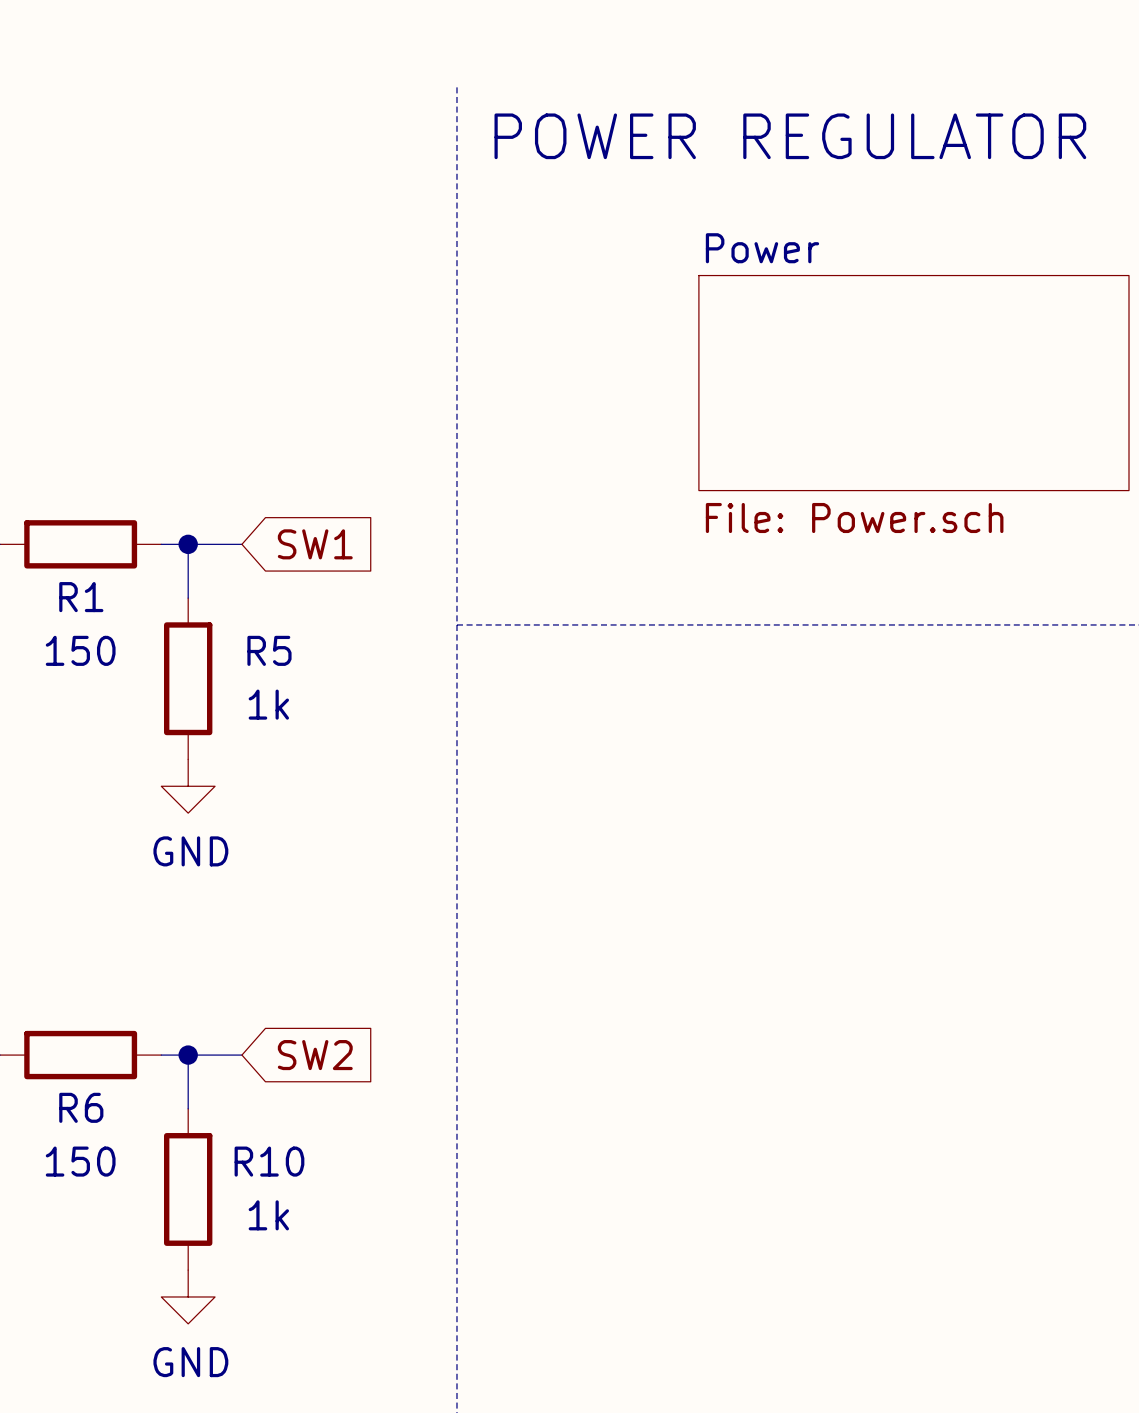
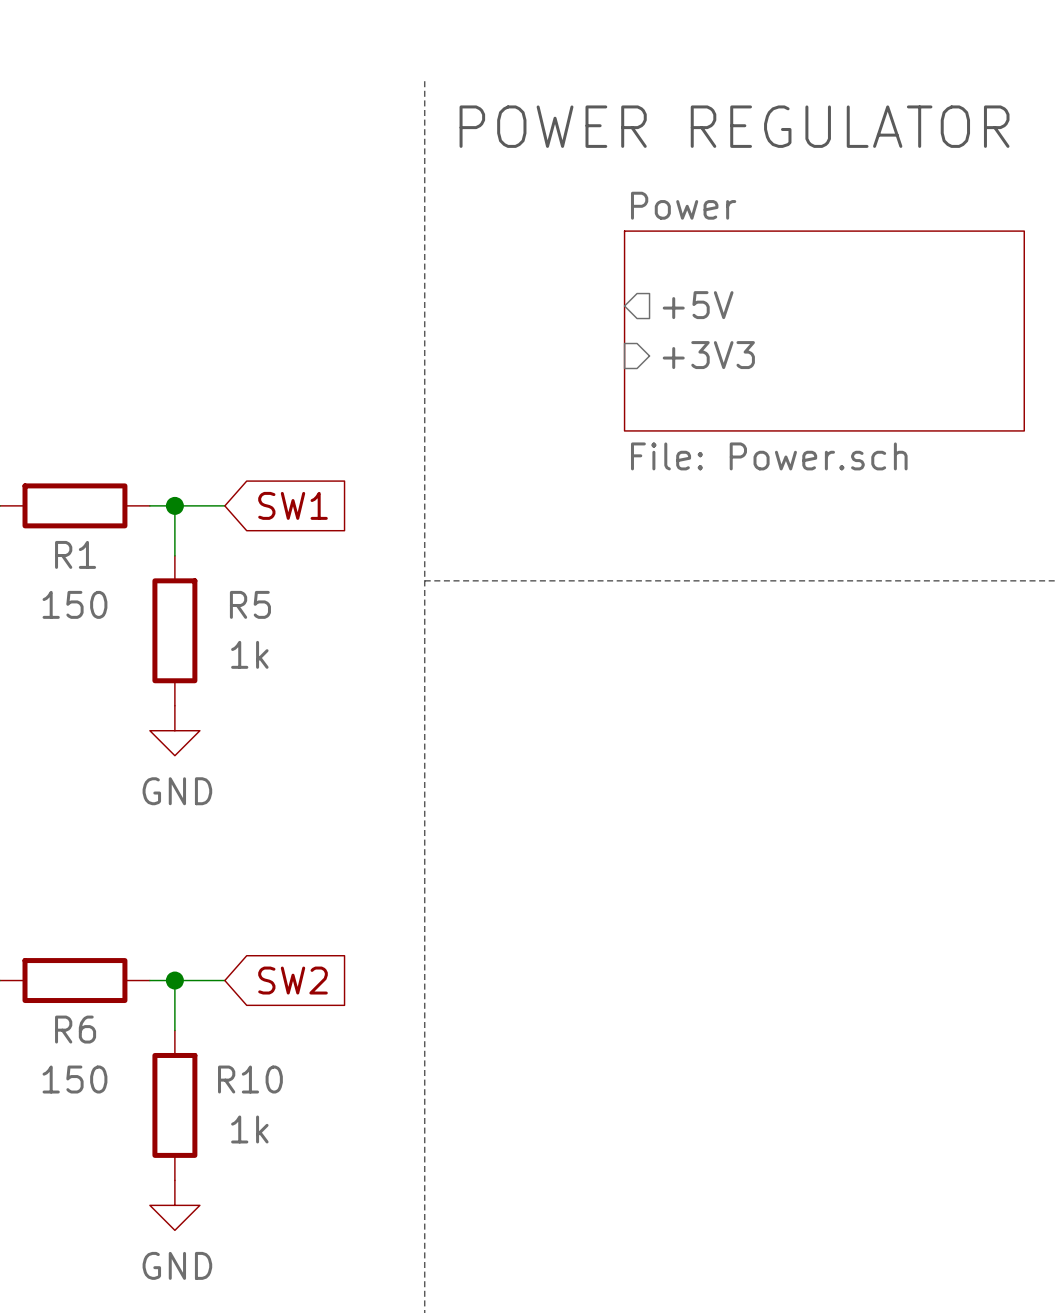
hierarchical label: none -> +5V (698, 305)
hierarchical label: none -> +3V3 (708, 355)
sheet Power position: (913, 383) -> (824, 331)

